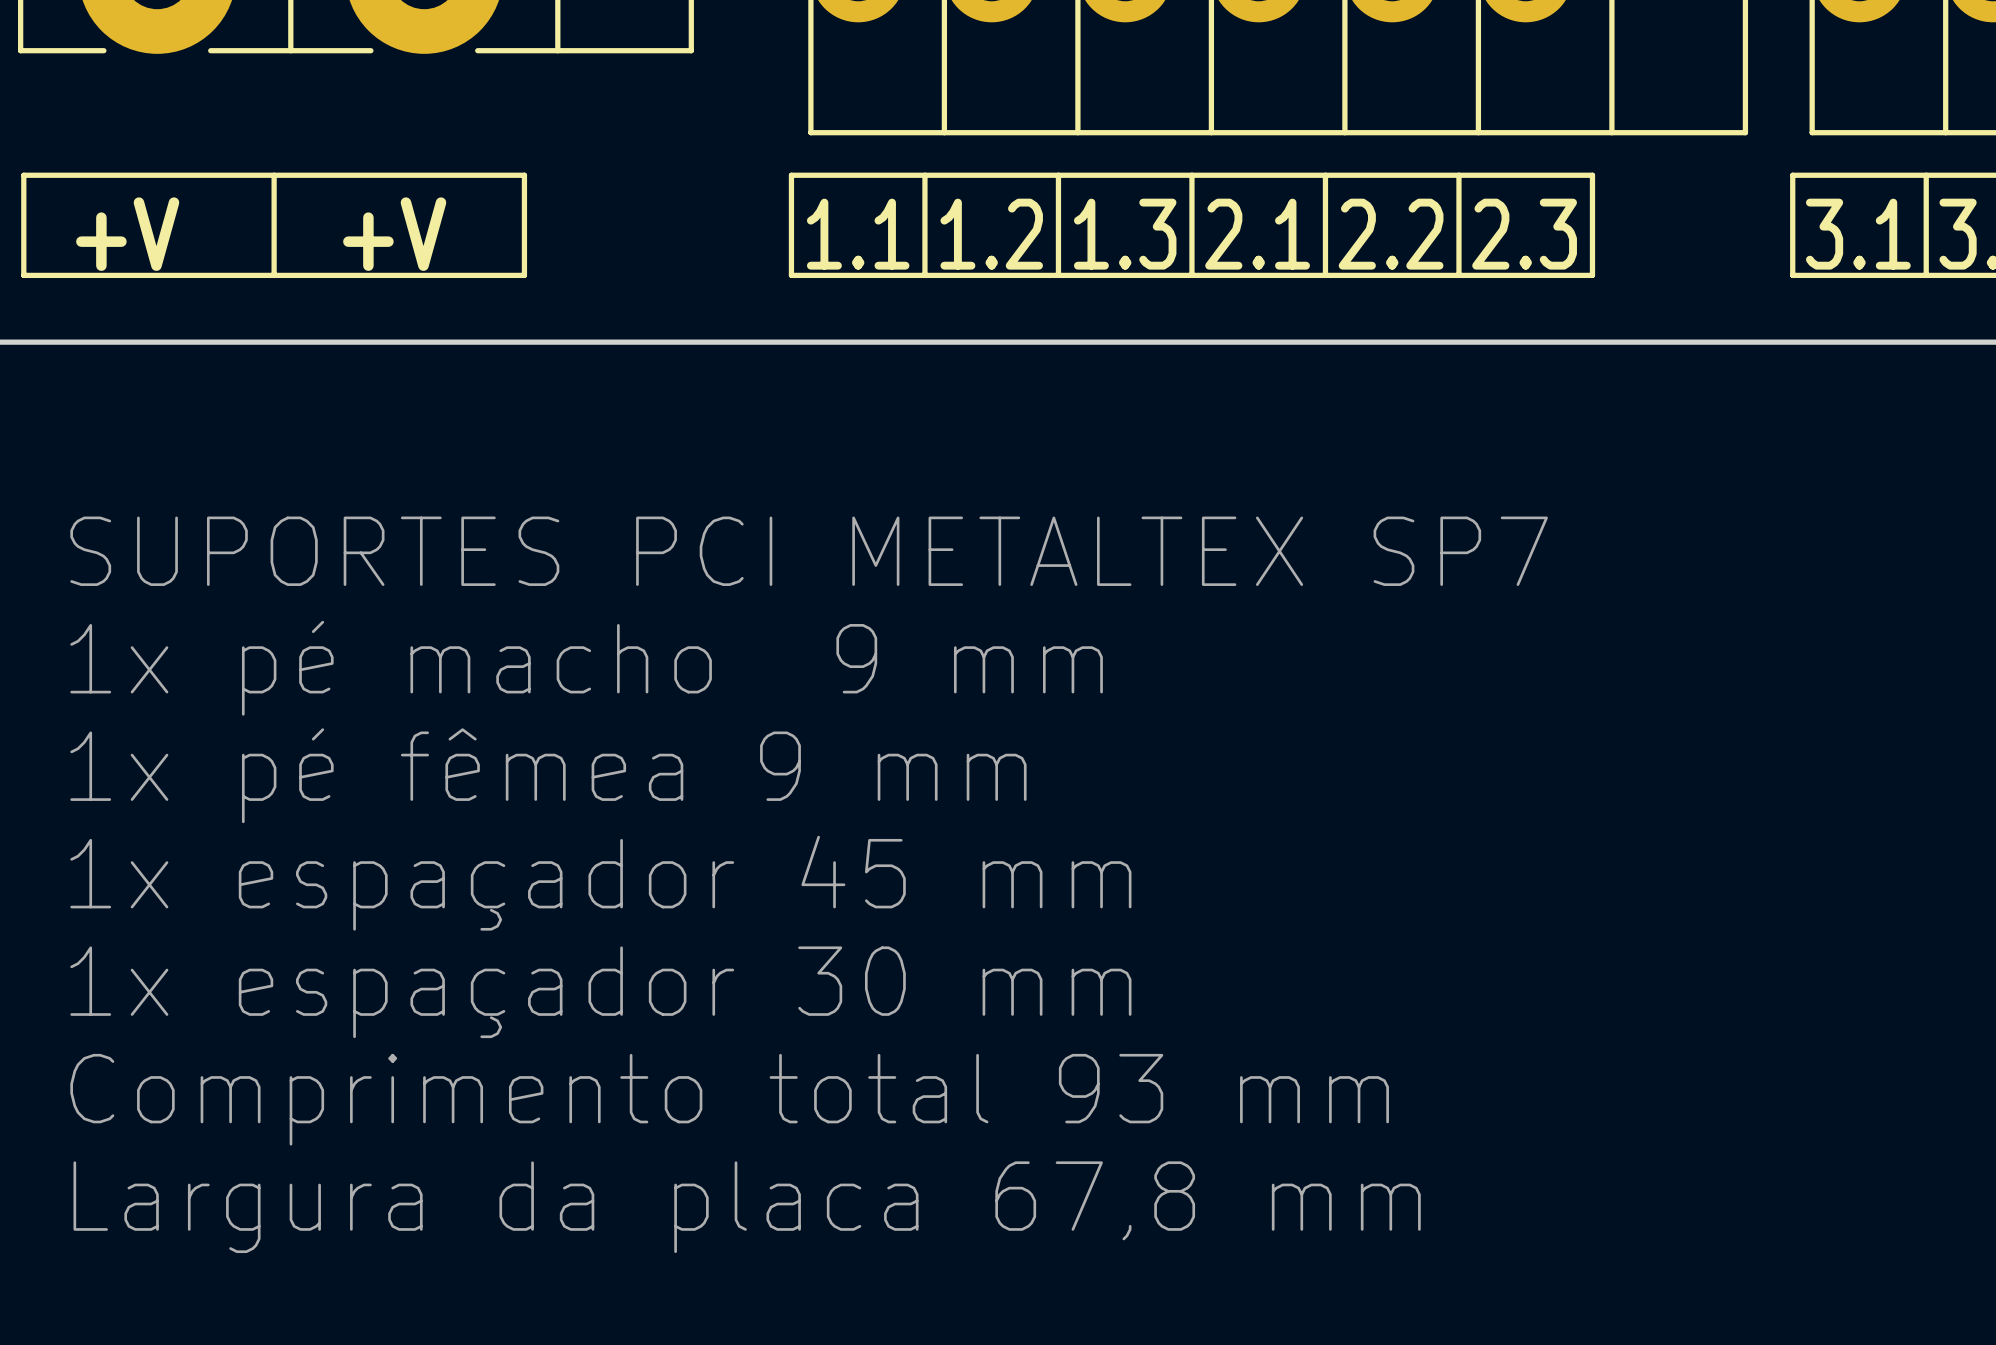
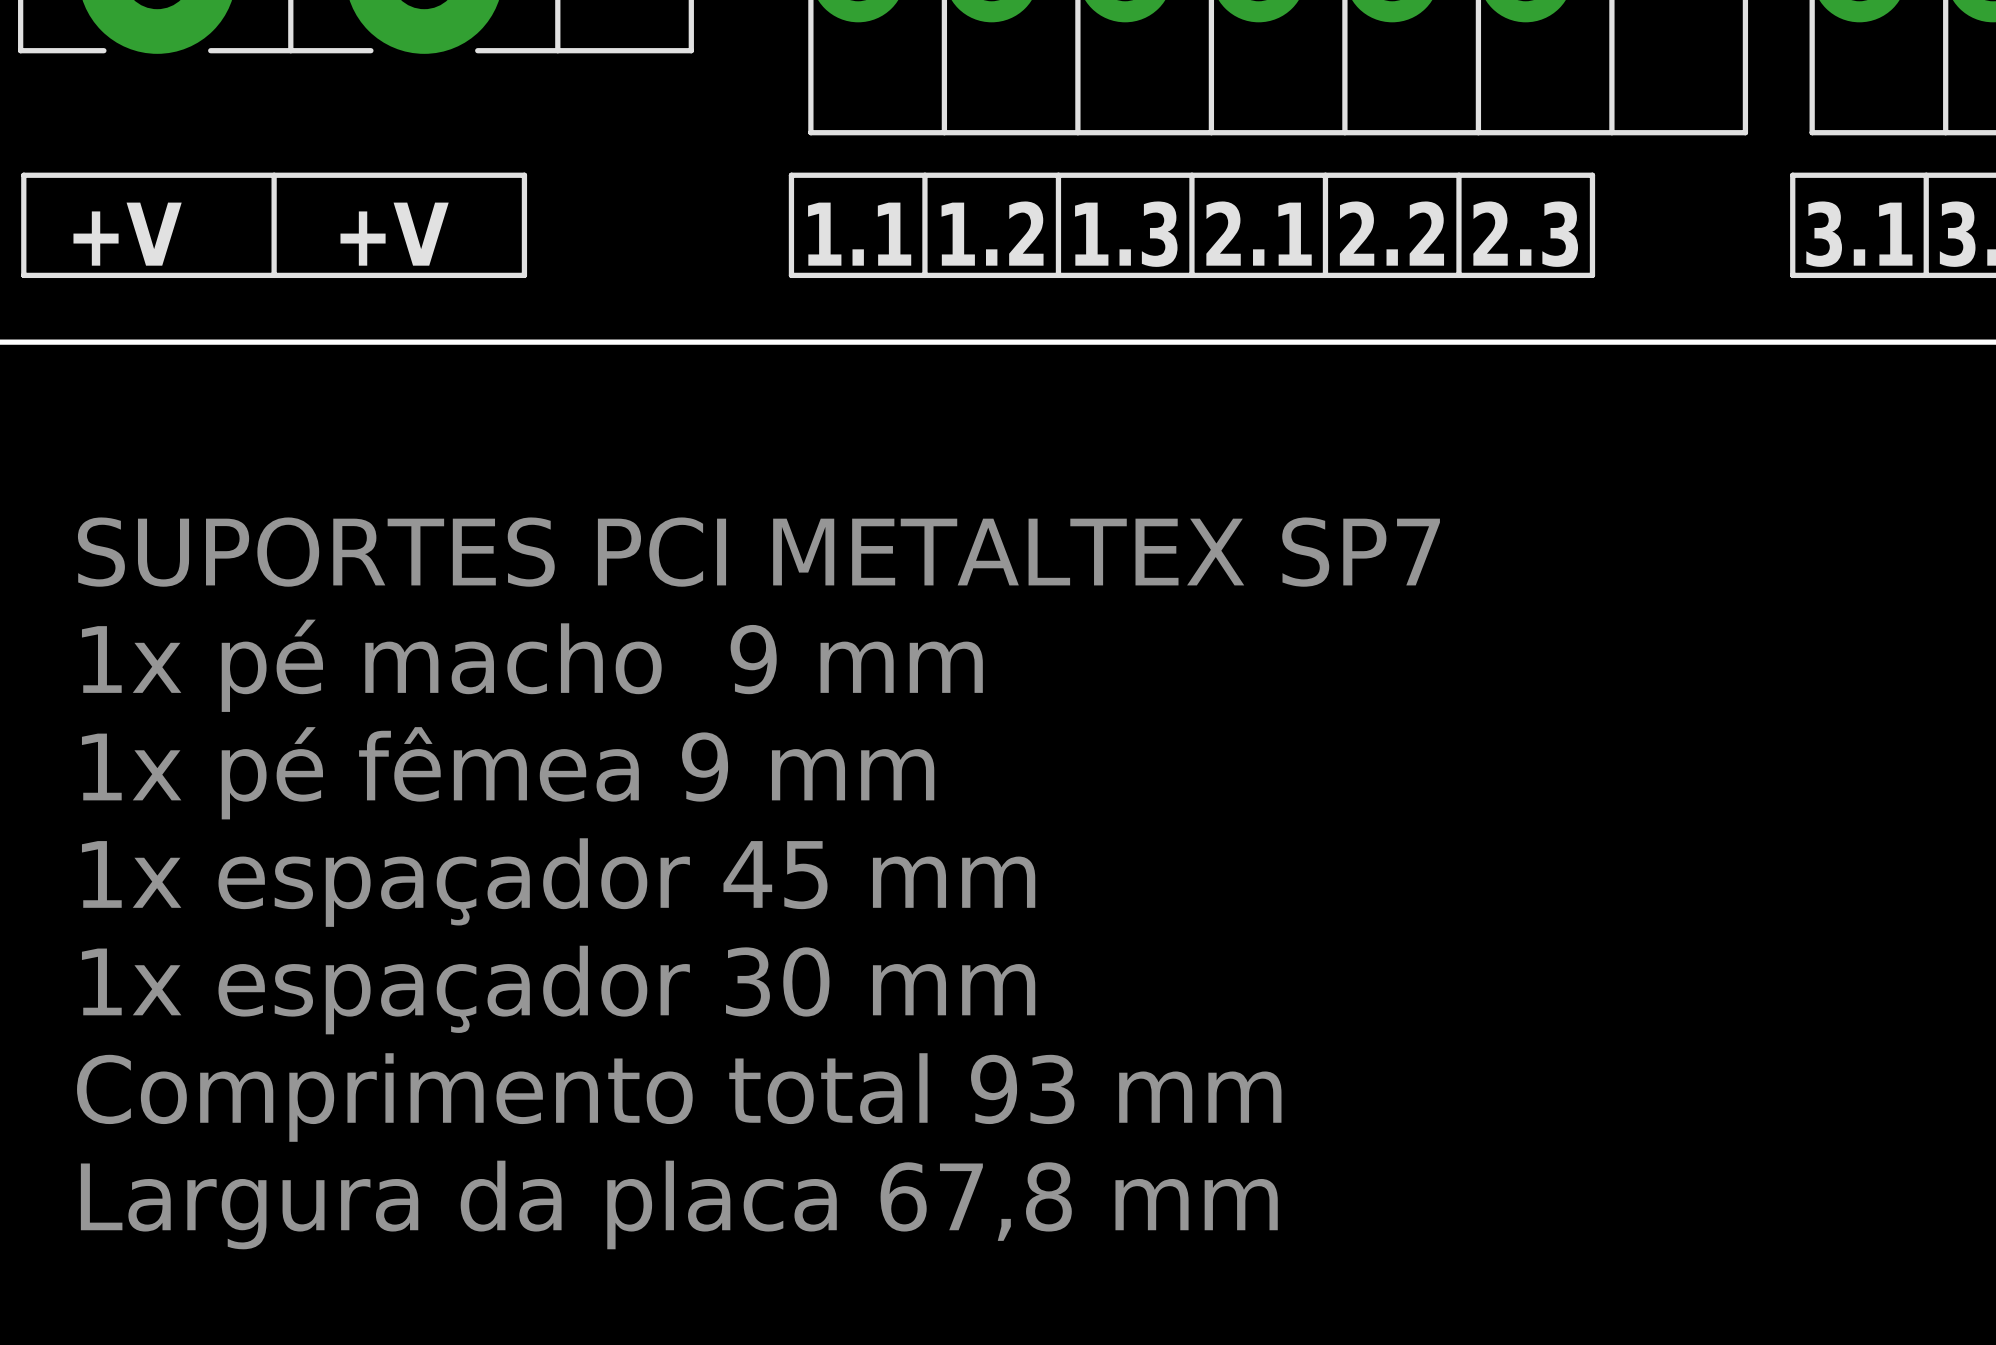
text position: SUPORTES PCI METALTEX SP7 (809, 551) -> SUPORTES PCI METALTEX SP7 (758, 552)
text position: 1x pé macho 9 mm (586, 668) -> 1x pé macho 9 mm (532, 665)
text position: 1x pé fêmea 9 mm (548, 775) -> 1x pé fêmea 9 mm (508, 773)
text position: 1x espaçador 45 mm (600, 883) -> 1x espaçador 45 mm (558, 882)
text position: 1x espaçador 30 mm (600, 992) -> 1x espaçador 30 mm (558, 990)
text position: Comprimento total 93 mm (729, 1099) -> Comprimento total 93 mm (679, 1097)
text position: Largura da placa 67,8 mm (747, 1207) -> Largura da placa 67,8 mm (679, 1204)

